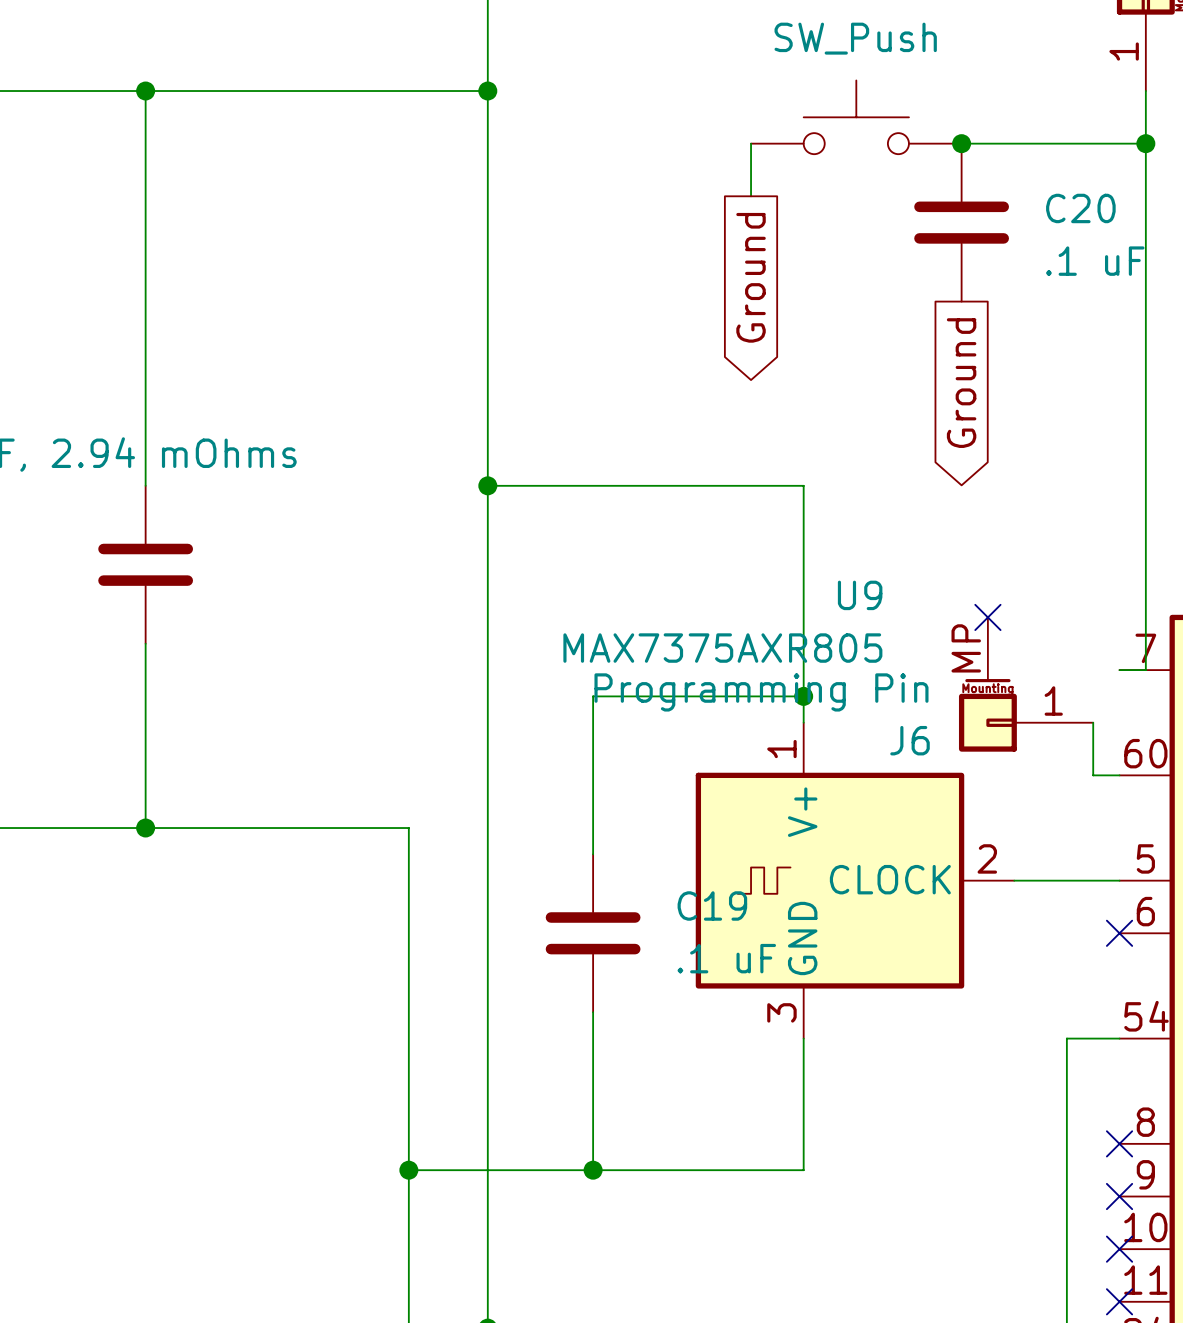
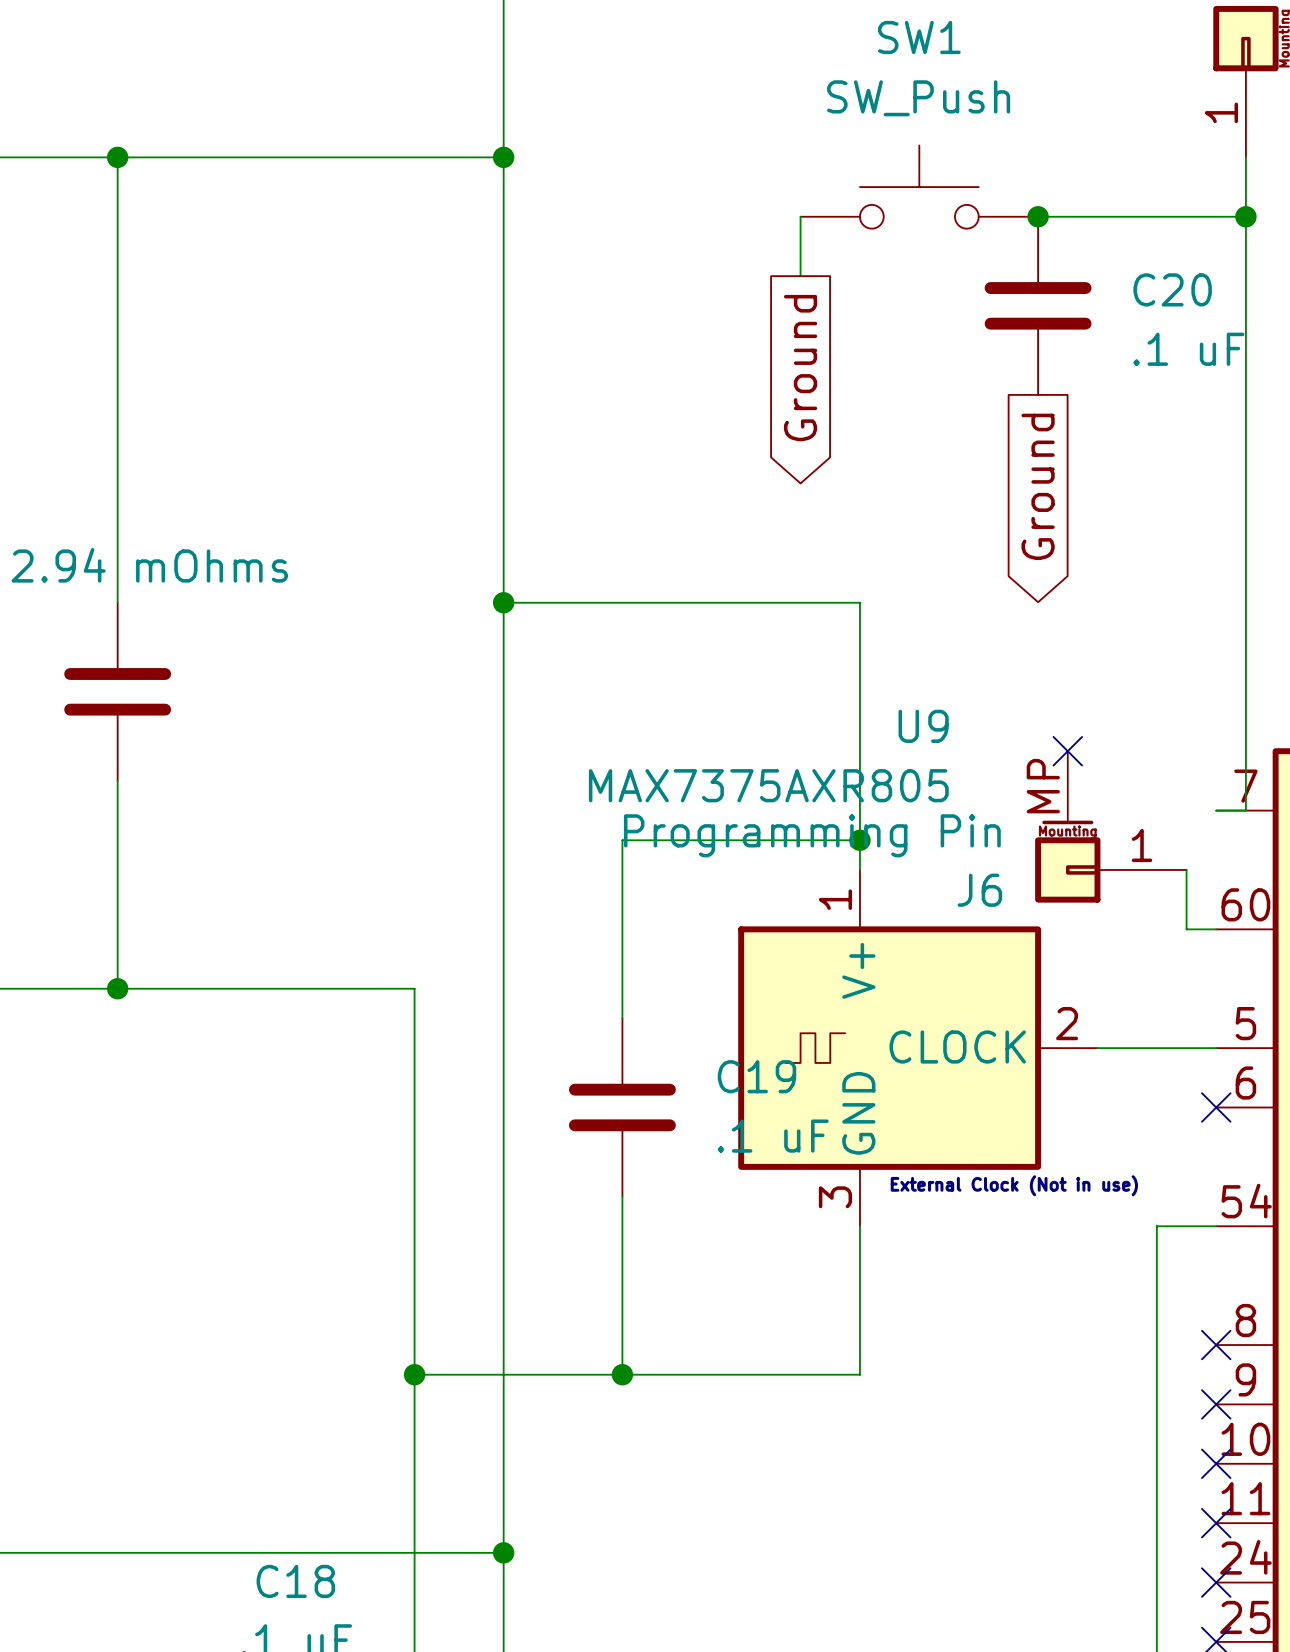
text: none -> External Clock (Not in use) (1014, 1185)

